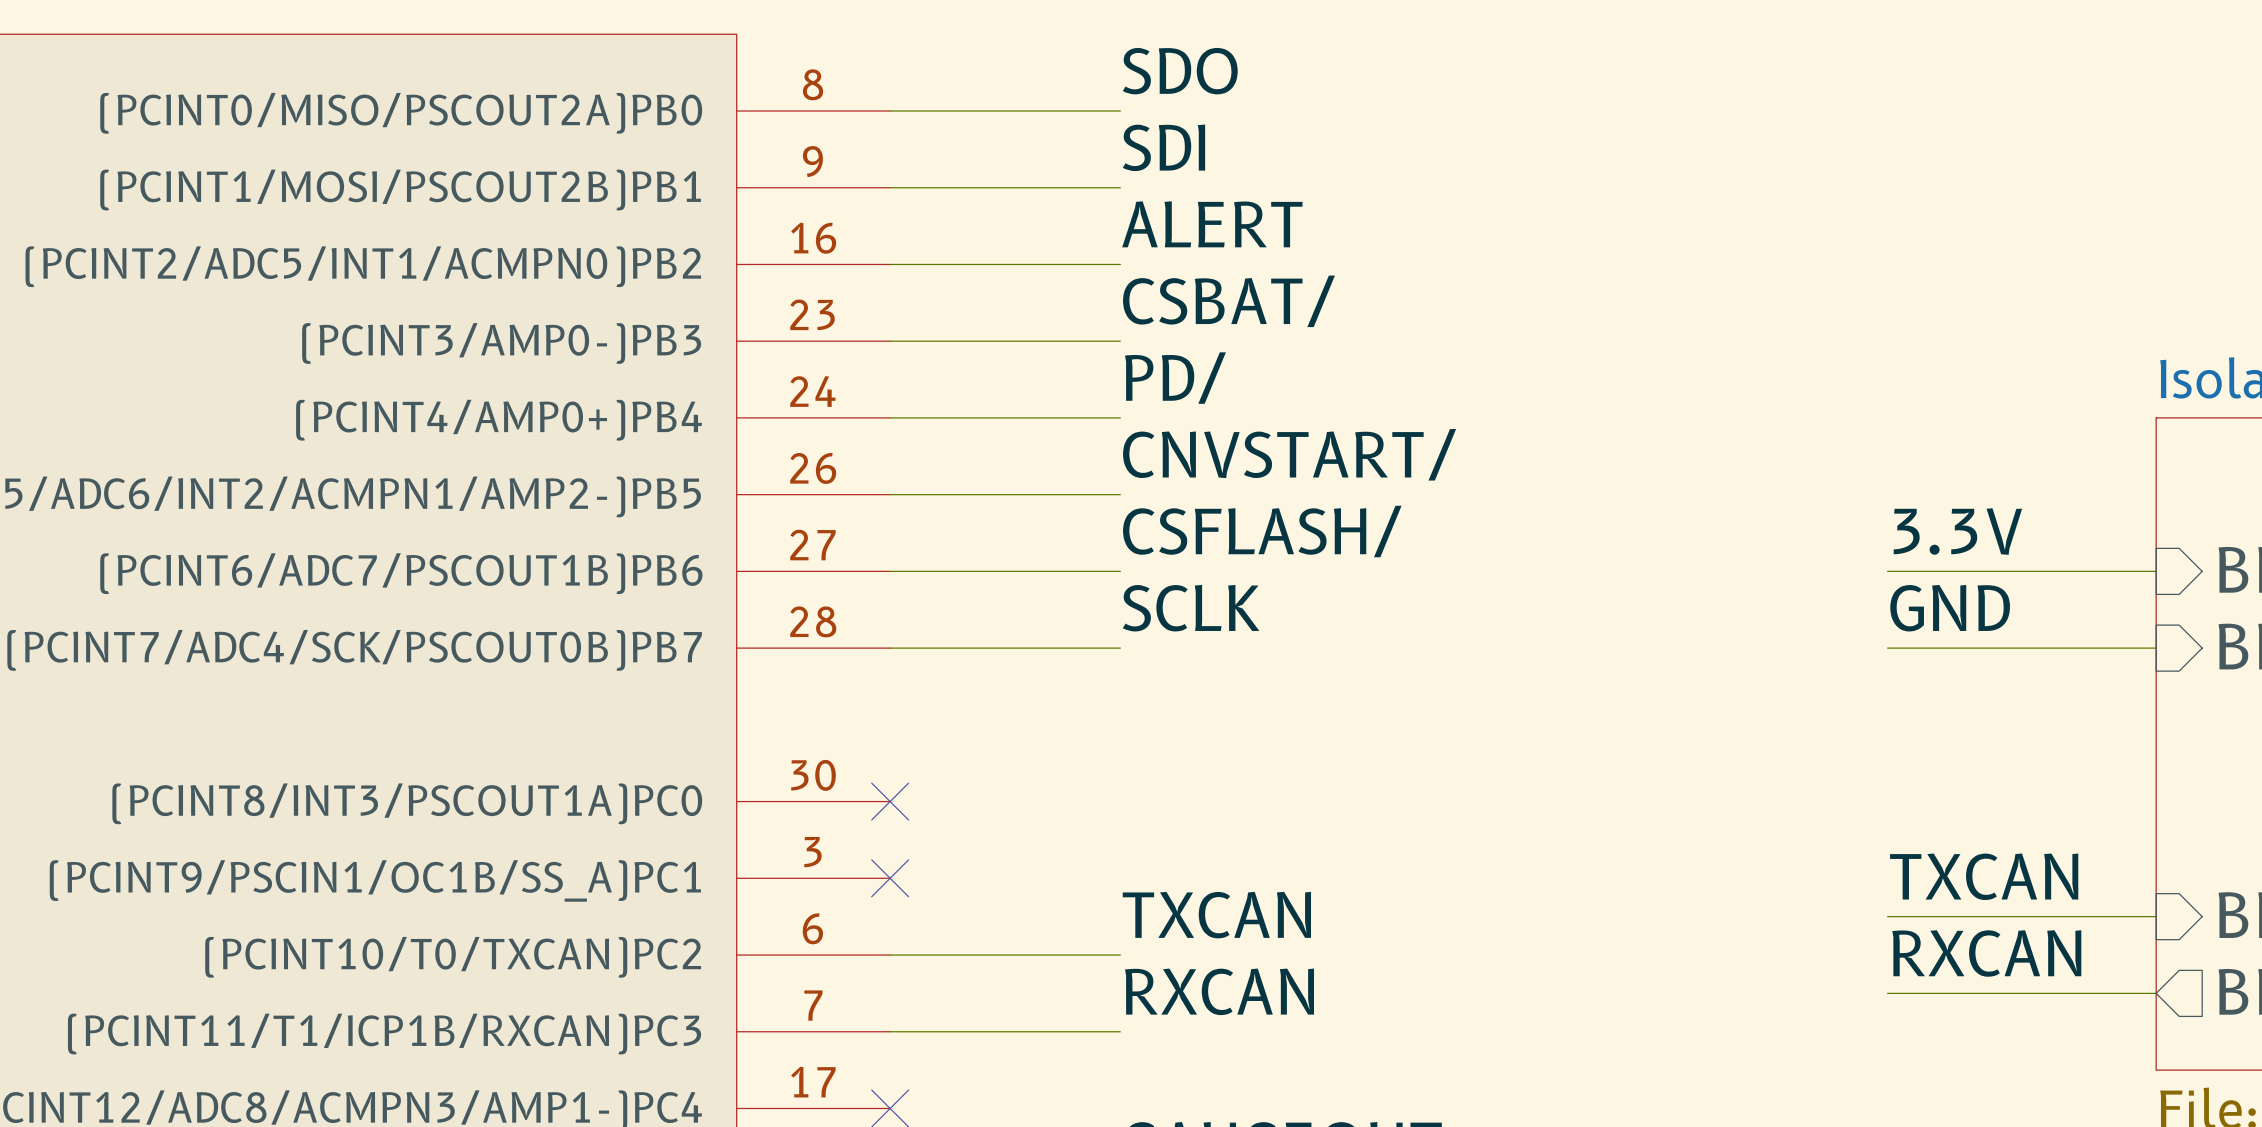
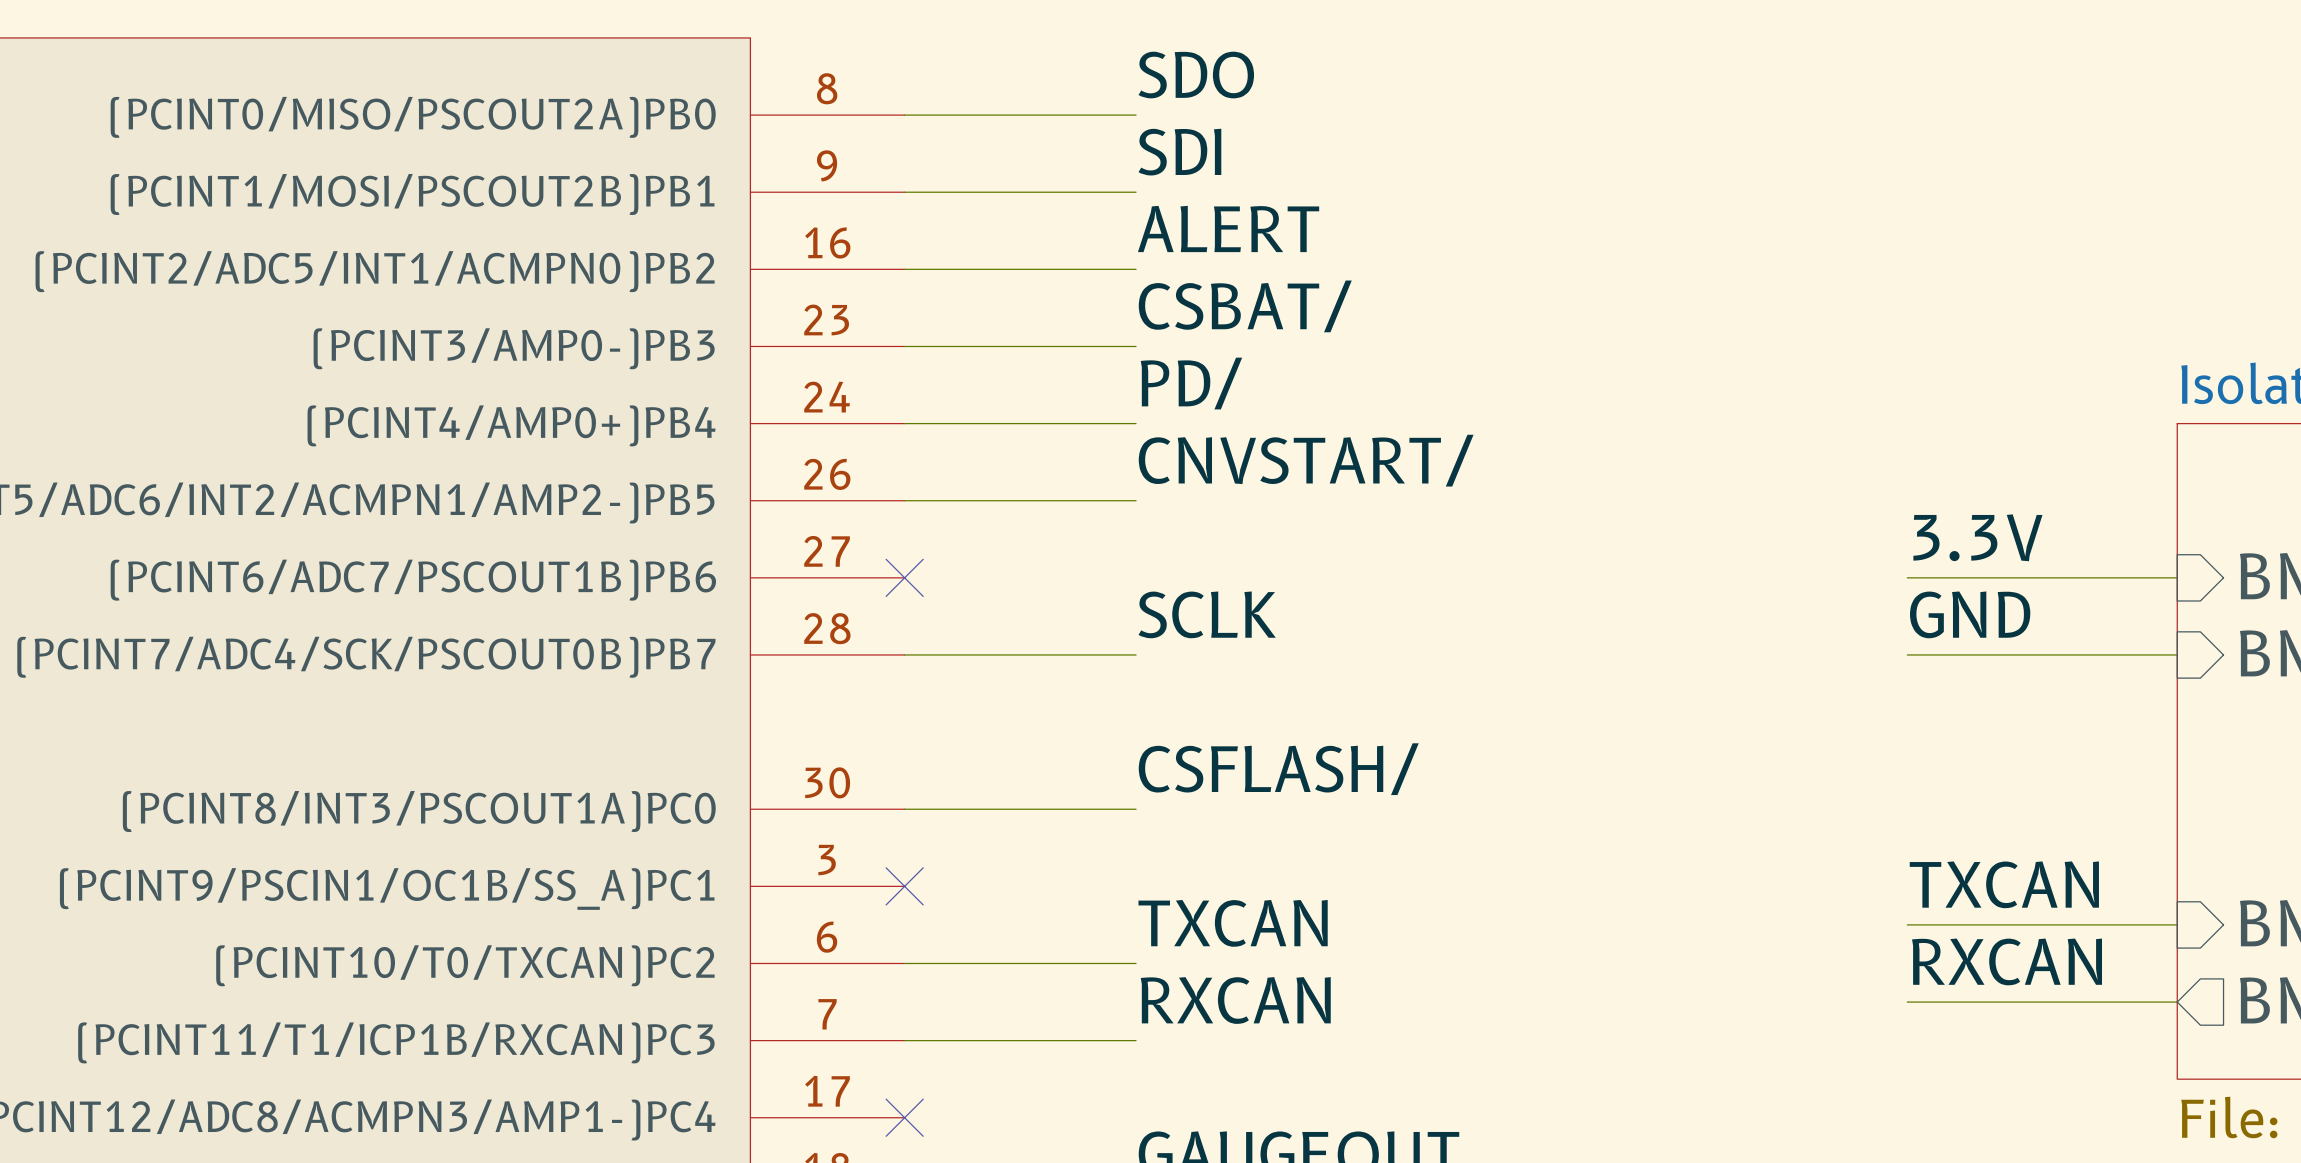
label position: CSFLASH/ (1262, 531) -> CSFLASH/ (1278, 769)
wire: (890, 571) (1120, 571) -> (904, 809) (1136, 809)
no-connect mark: none -> (904, 577)
no-connect mark: (890, 801) -> none

